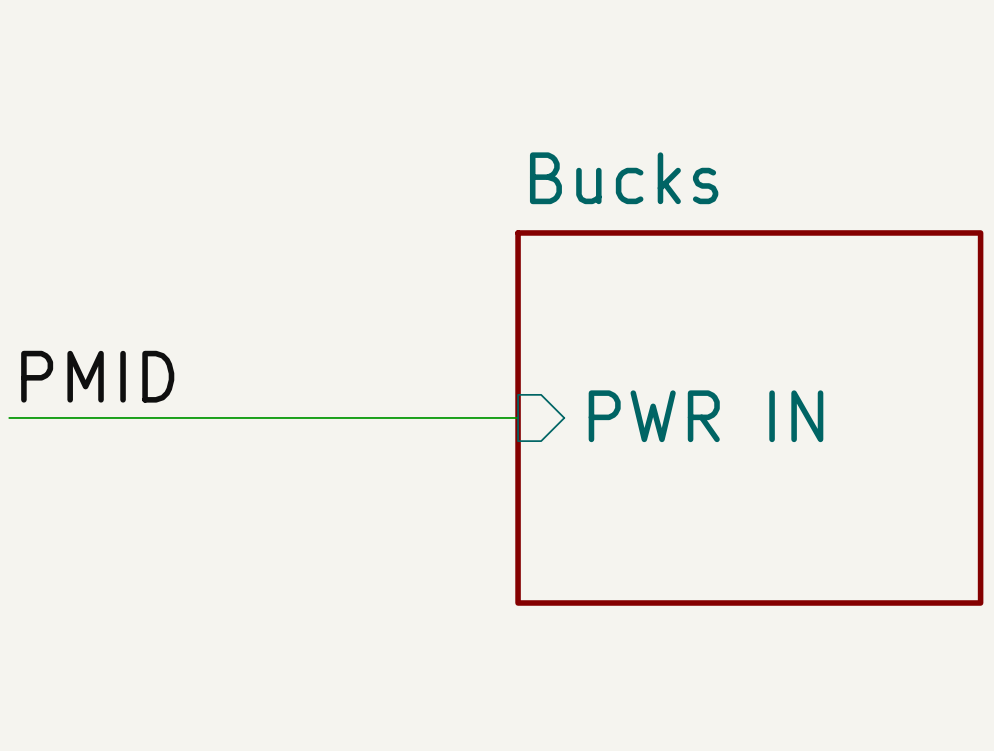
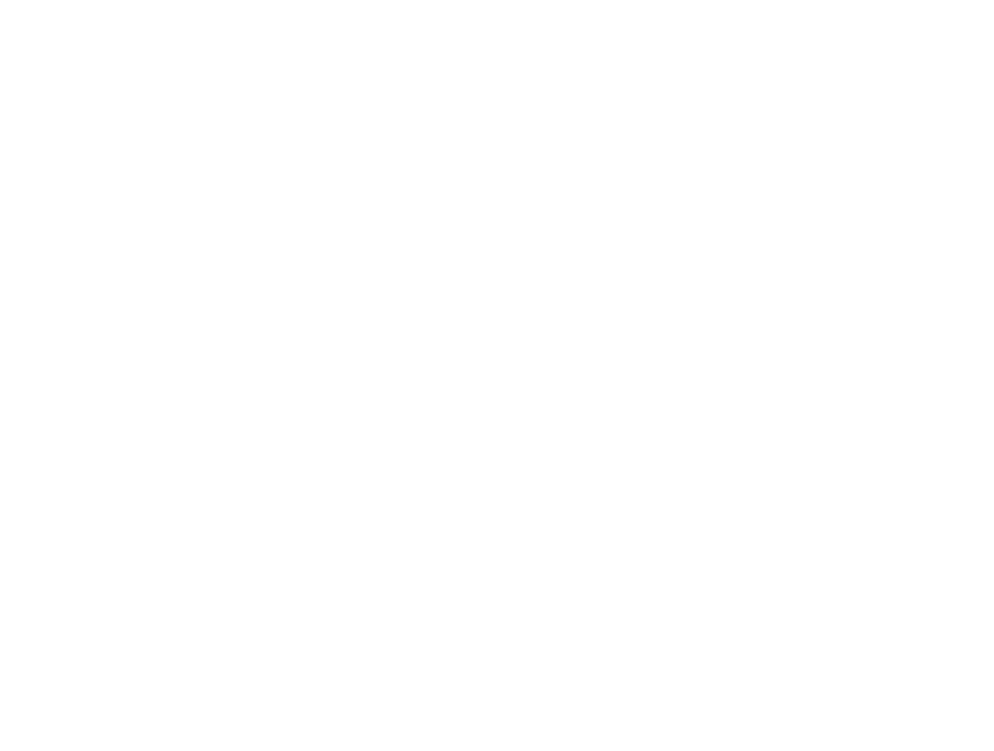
label: PMID (97, 376) -> none
sheet pin: PWR IN (705, 416) -> none
wire: (9, 417) (518, 417) -> none
sheet Bucks: (749, 417) -> none

